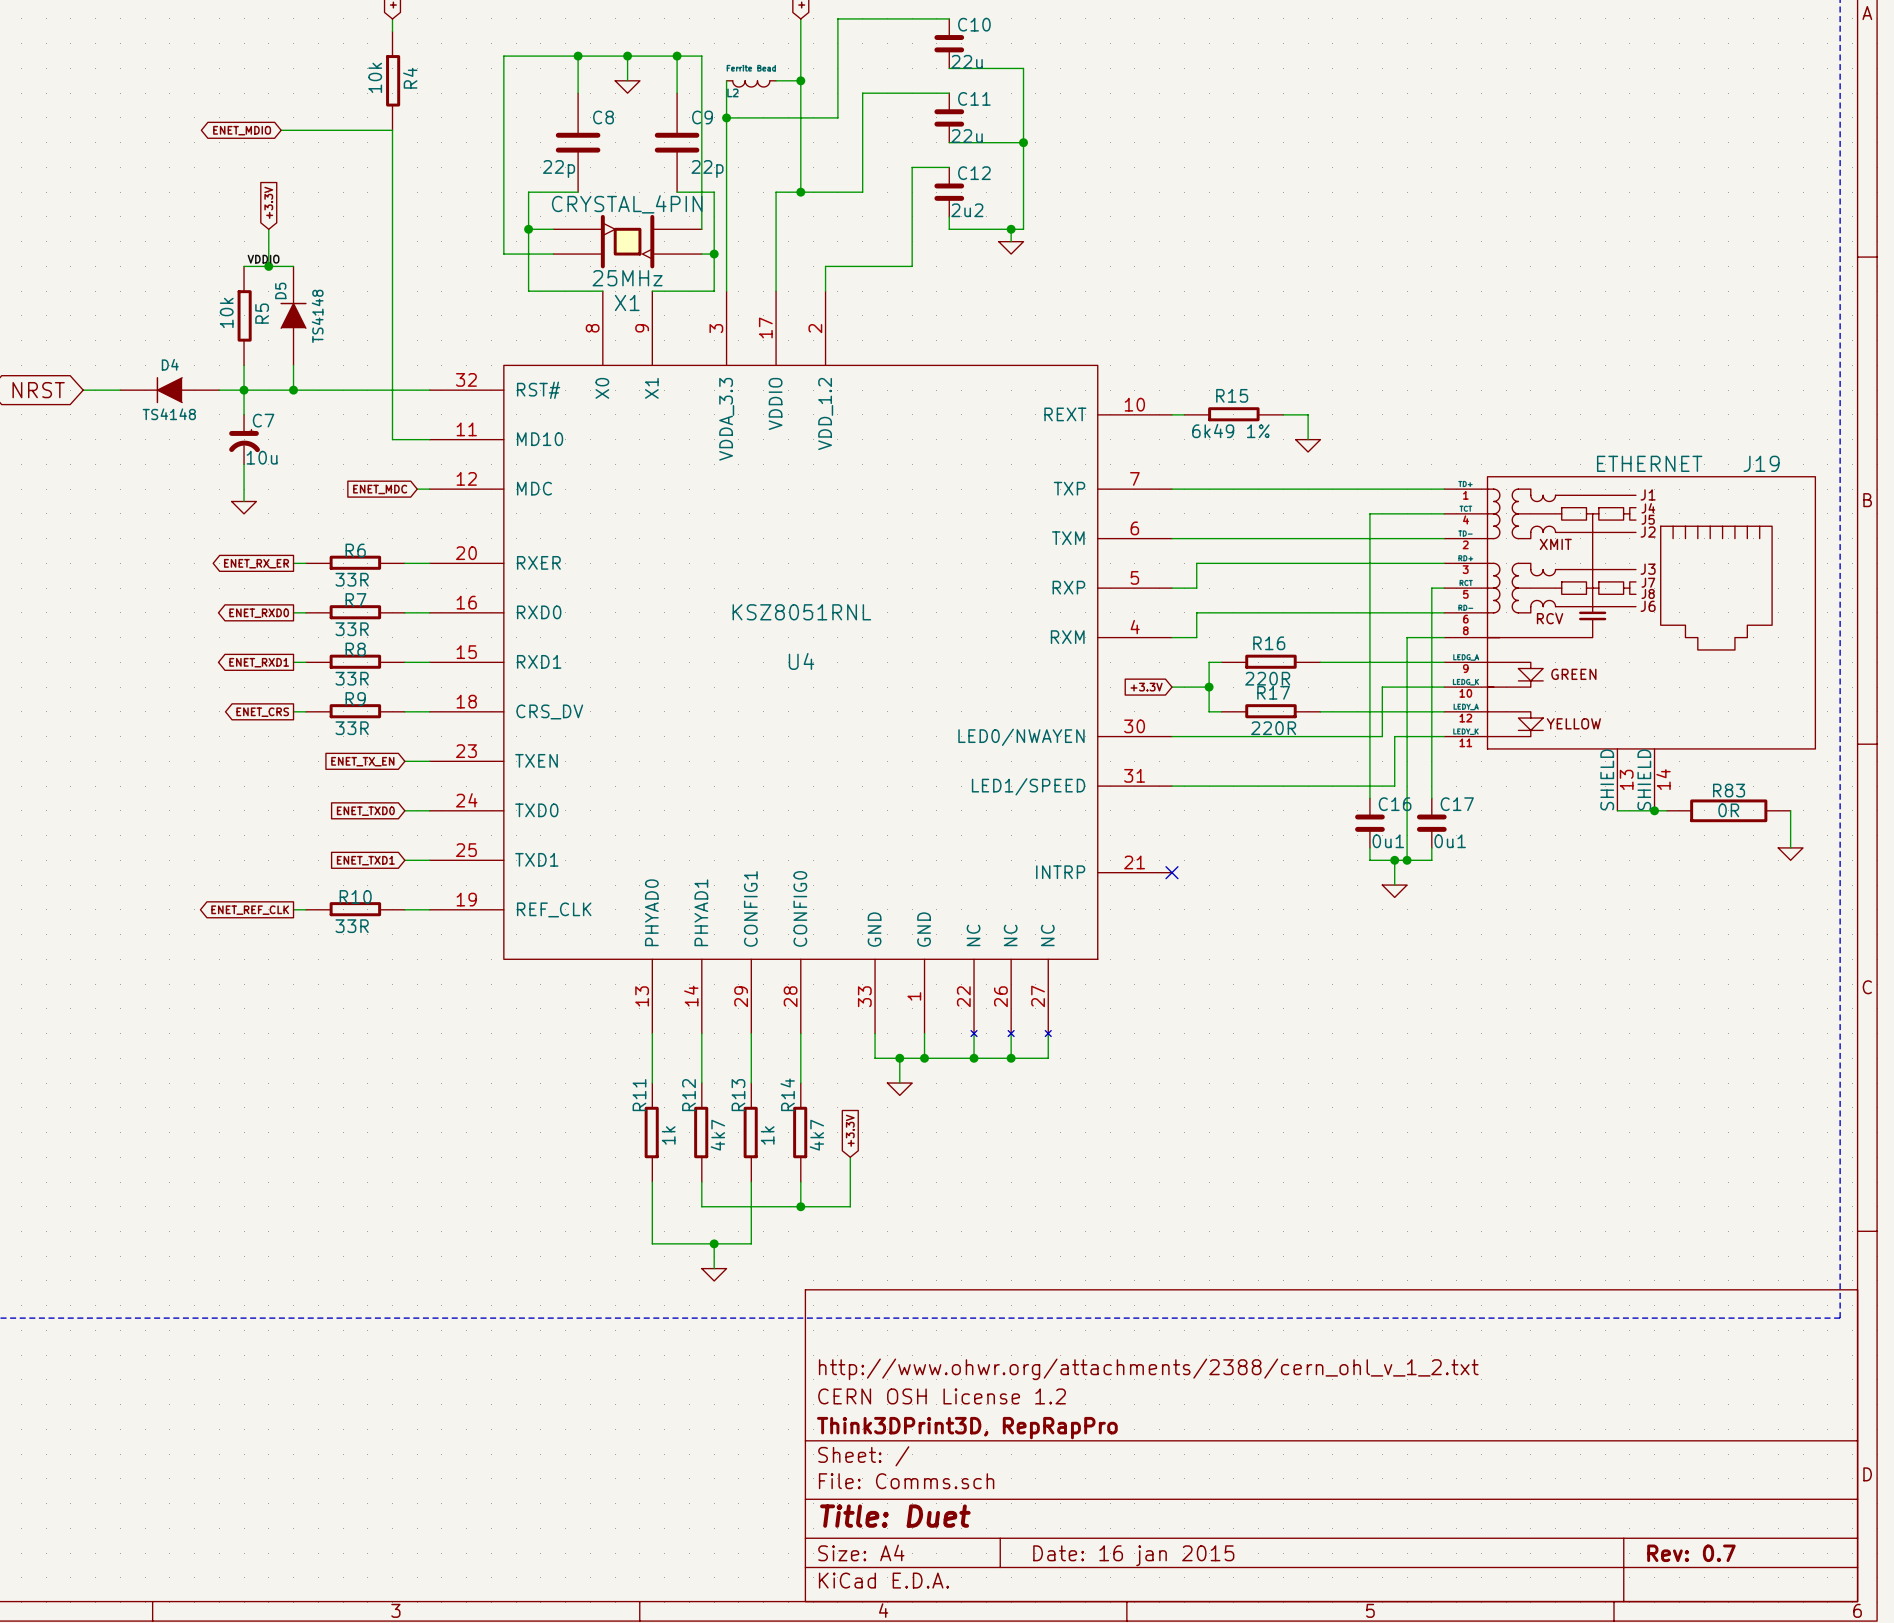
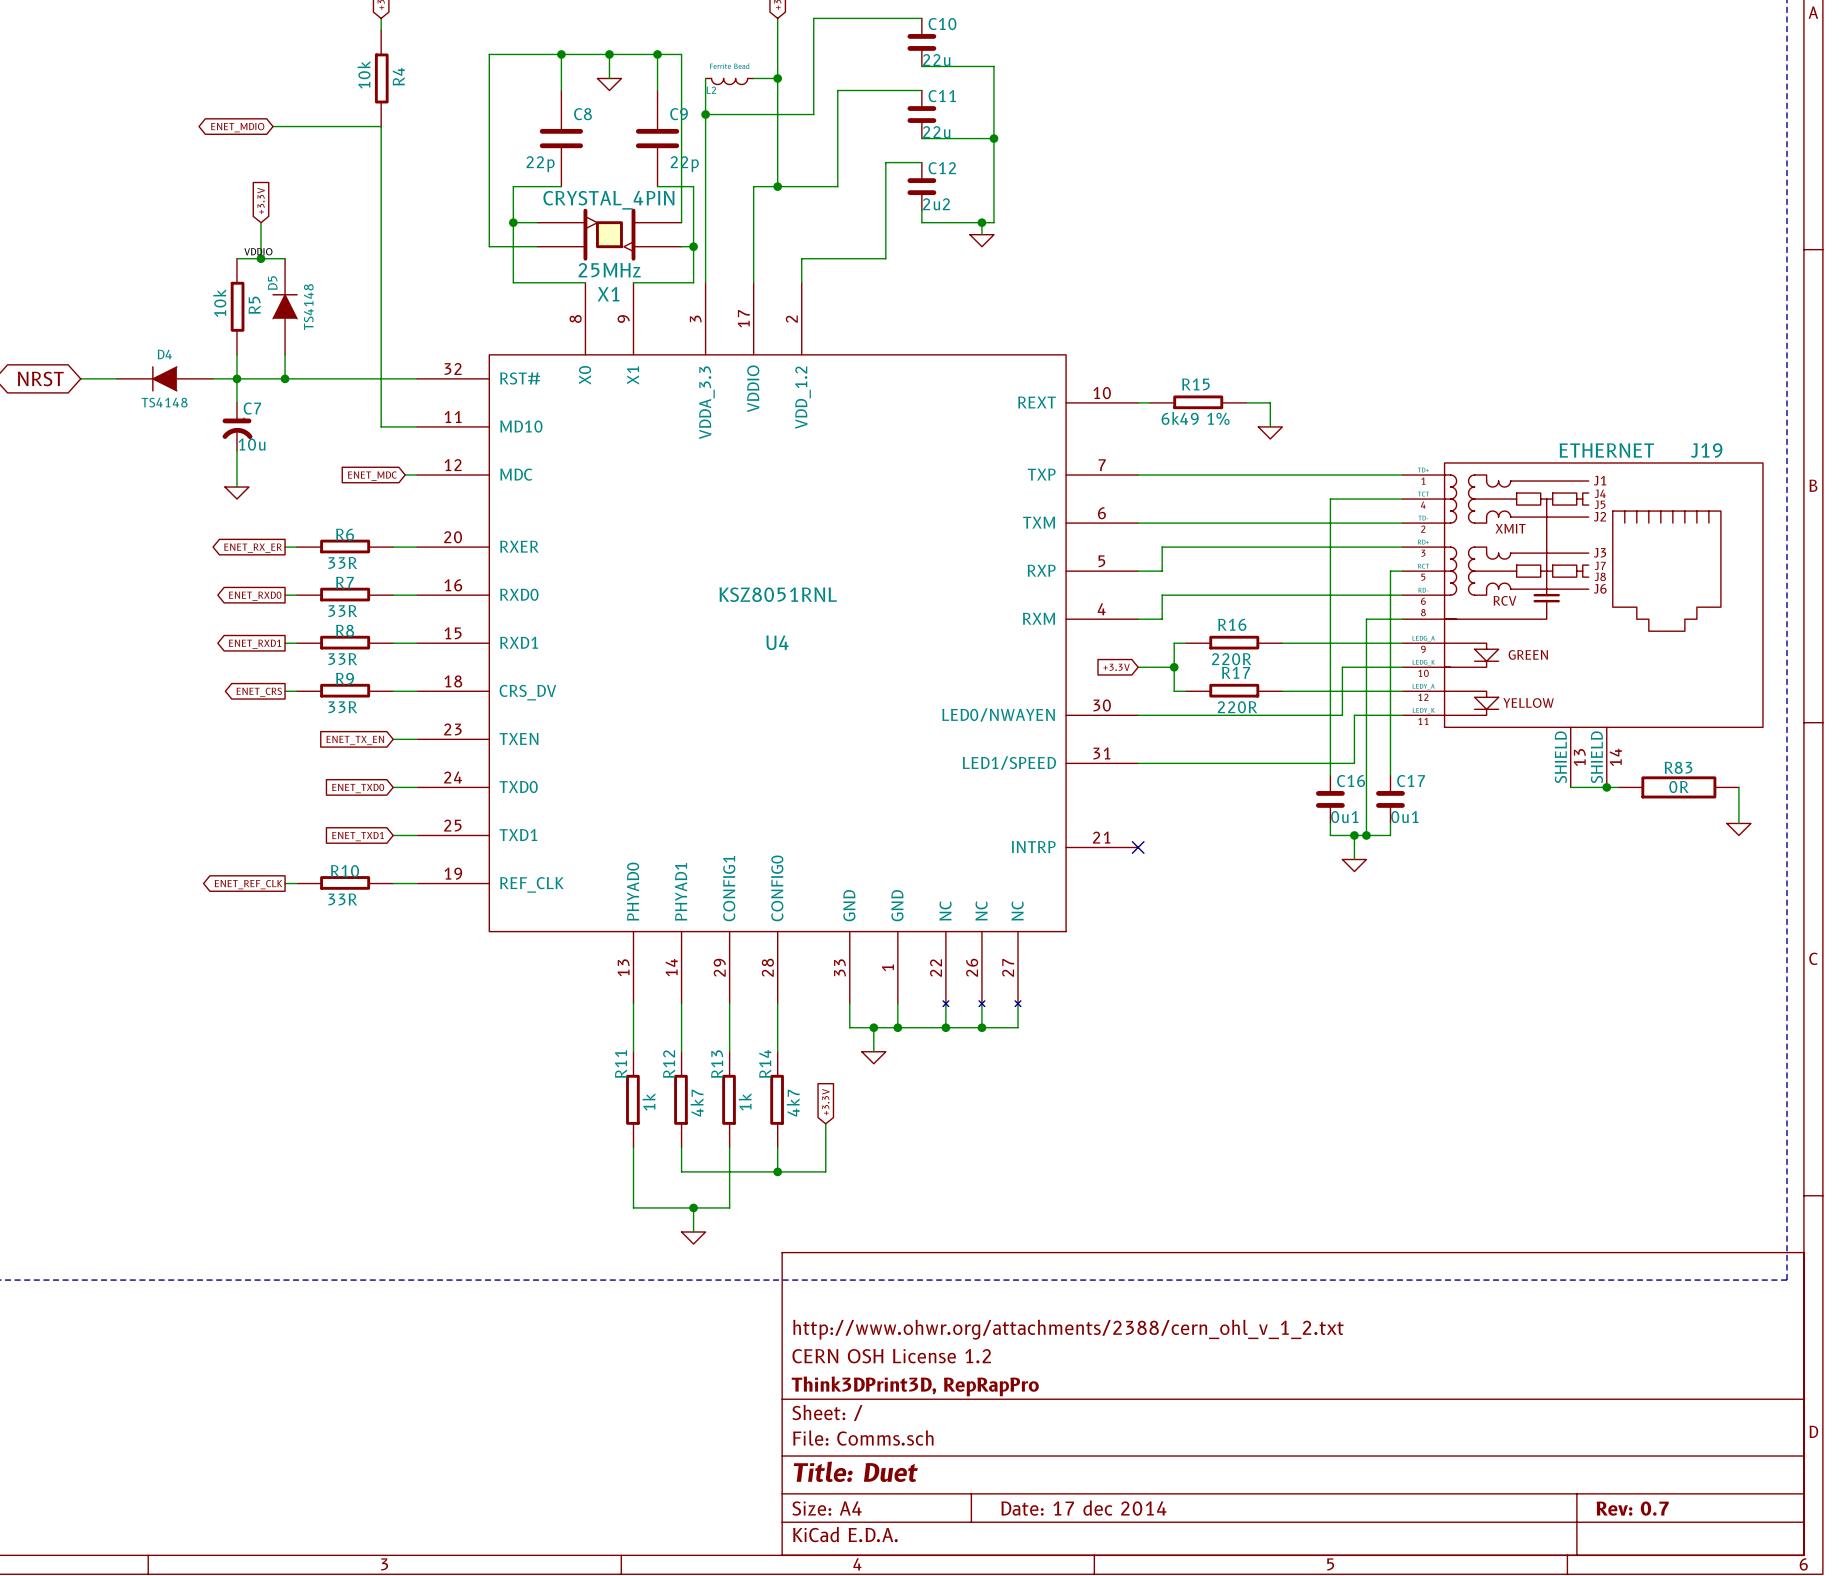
title block: Date: 16 jan 2015 (1133, 1555) -> Date: 17 dec 2014 (1083, 1508)

